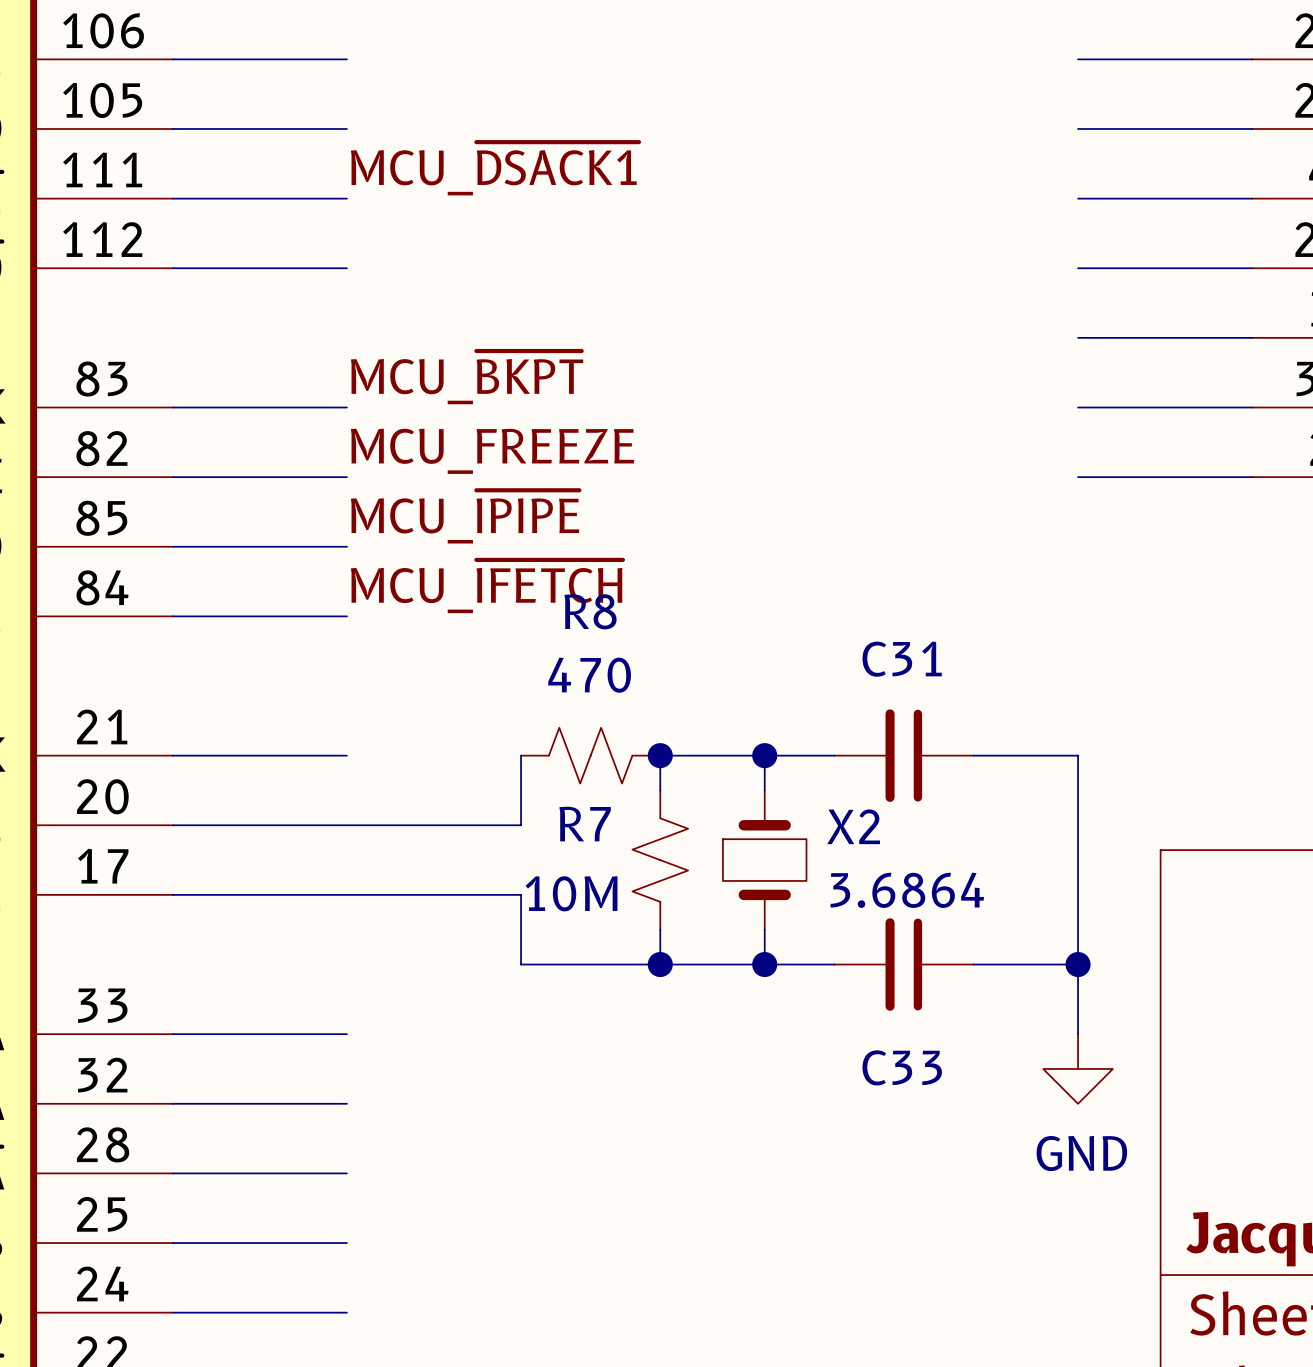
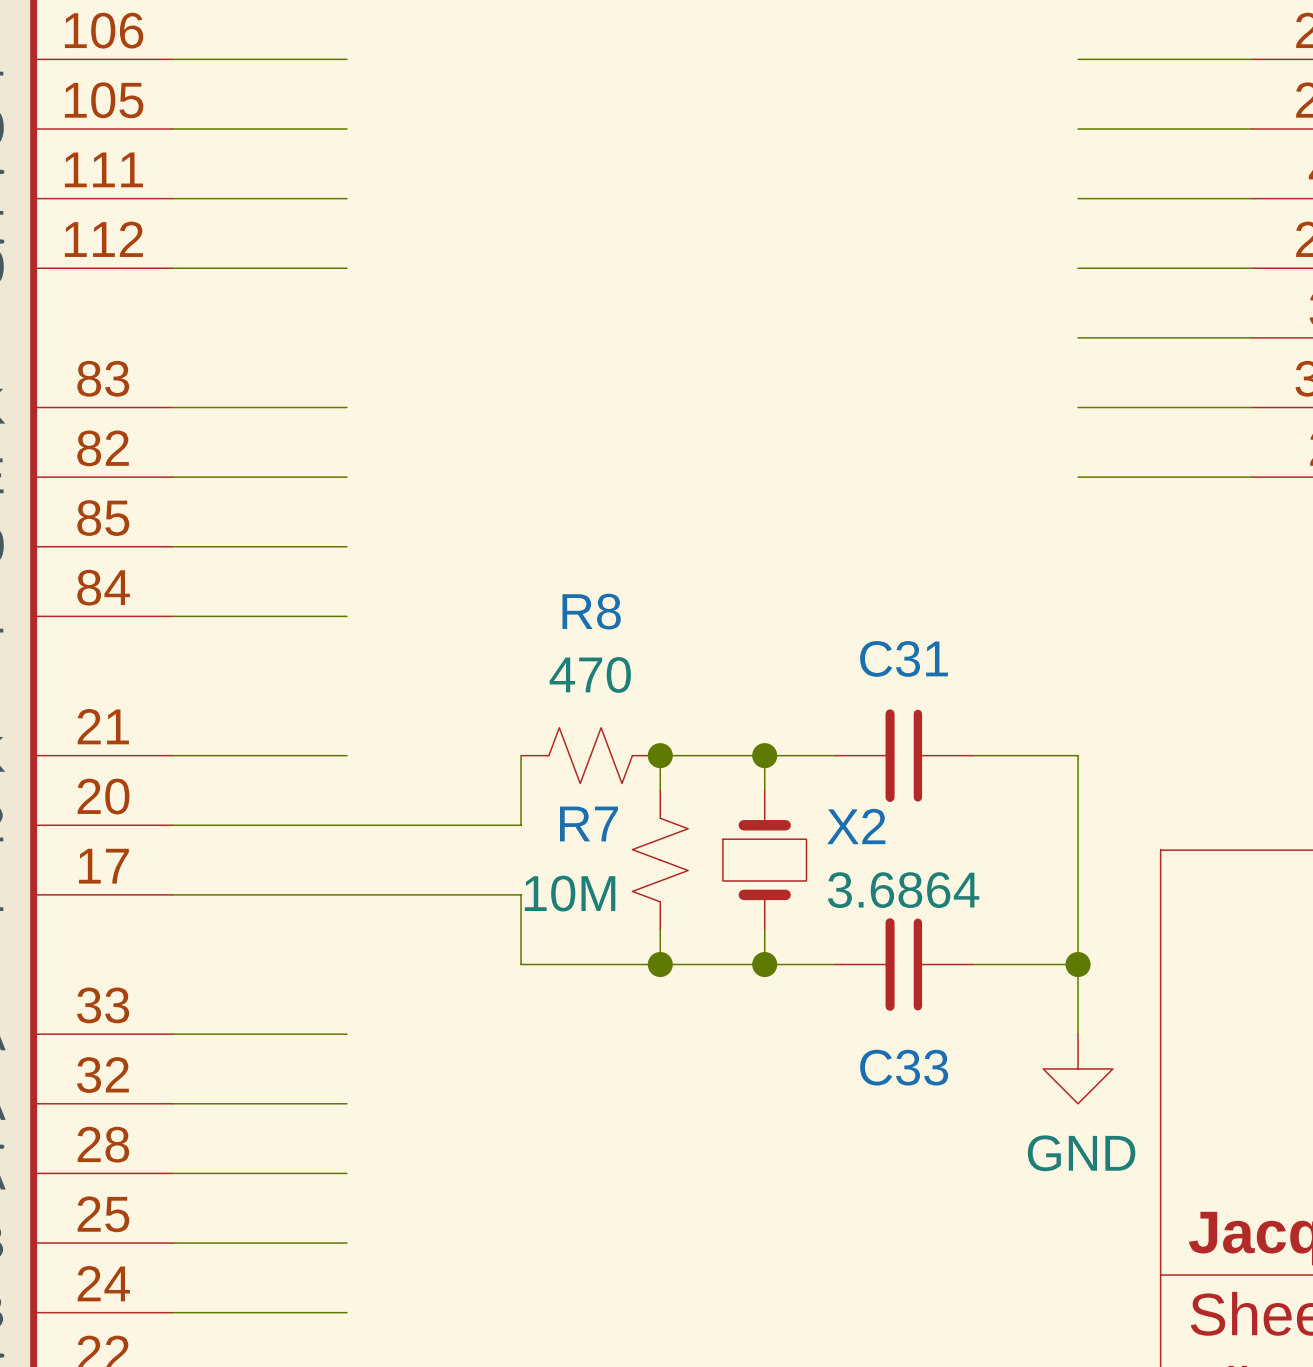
label: MCU_~{DSACK1} (494, 168) -> none
label: MCU_~{BKPT} (467, 377) -> none
label: MCU_FREEZE (492, 451) -> none
label: MCU_~{IPIPE} (465, 516) -> none
label: MCU_~{IFETCH} (486, 586) -> none

